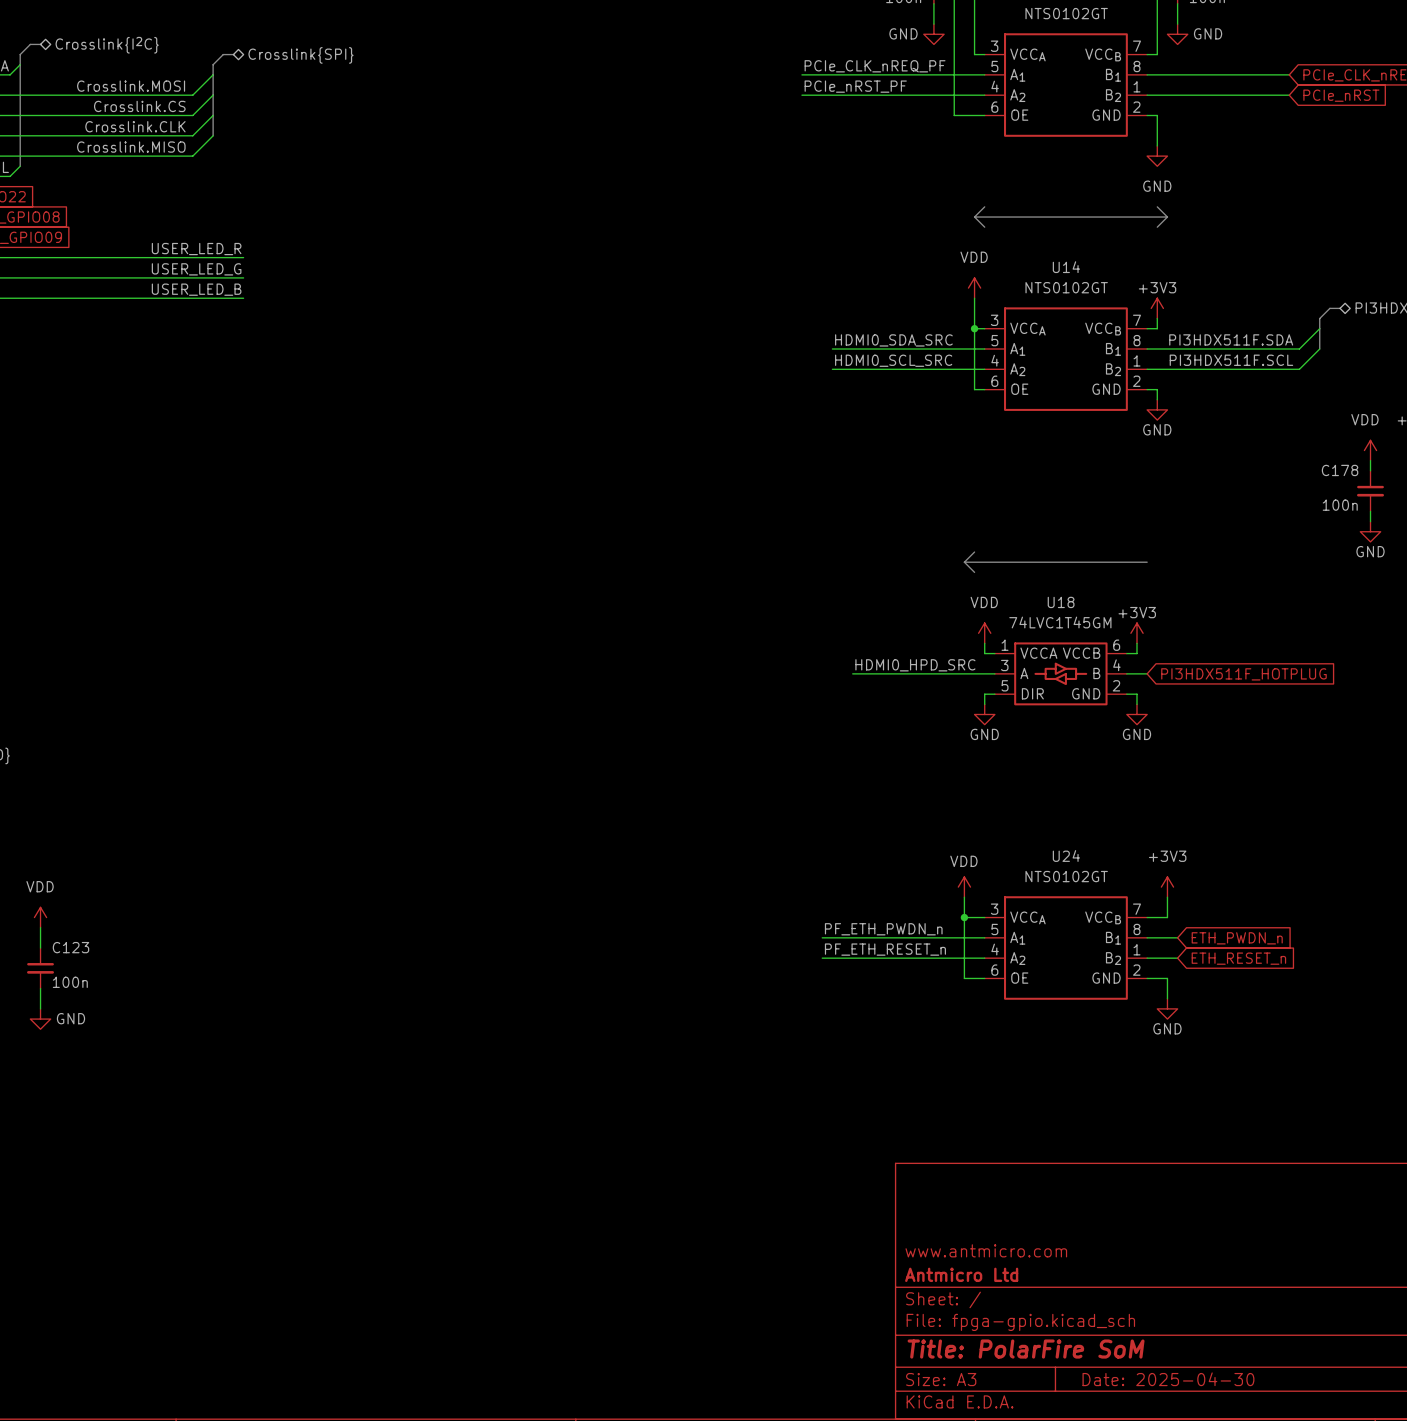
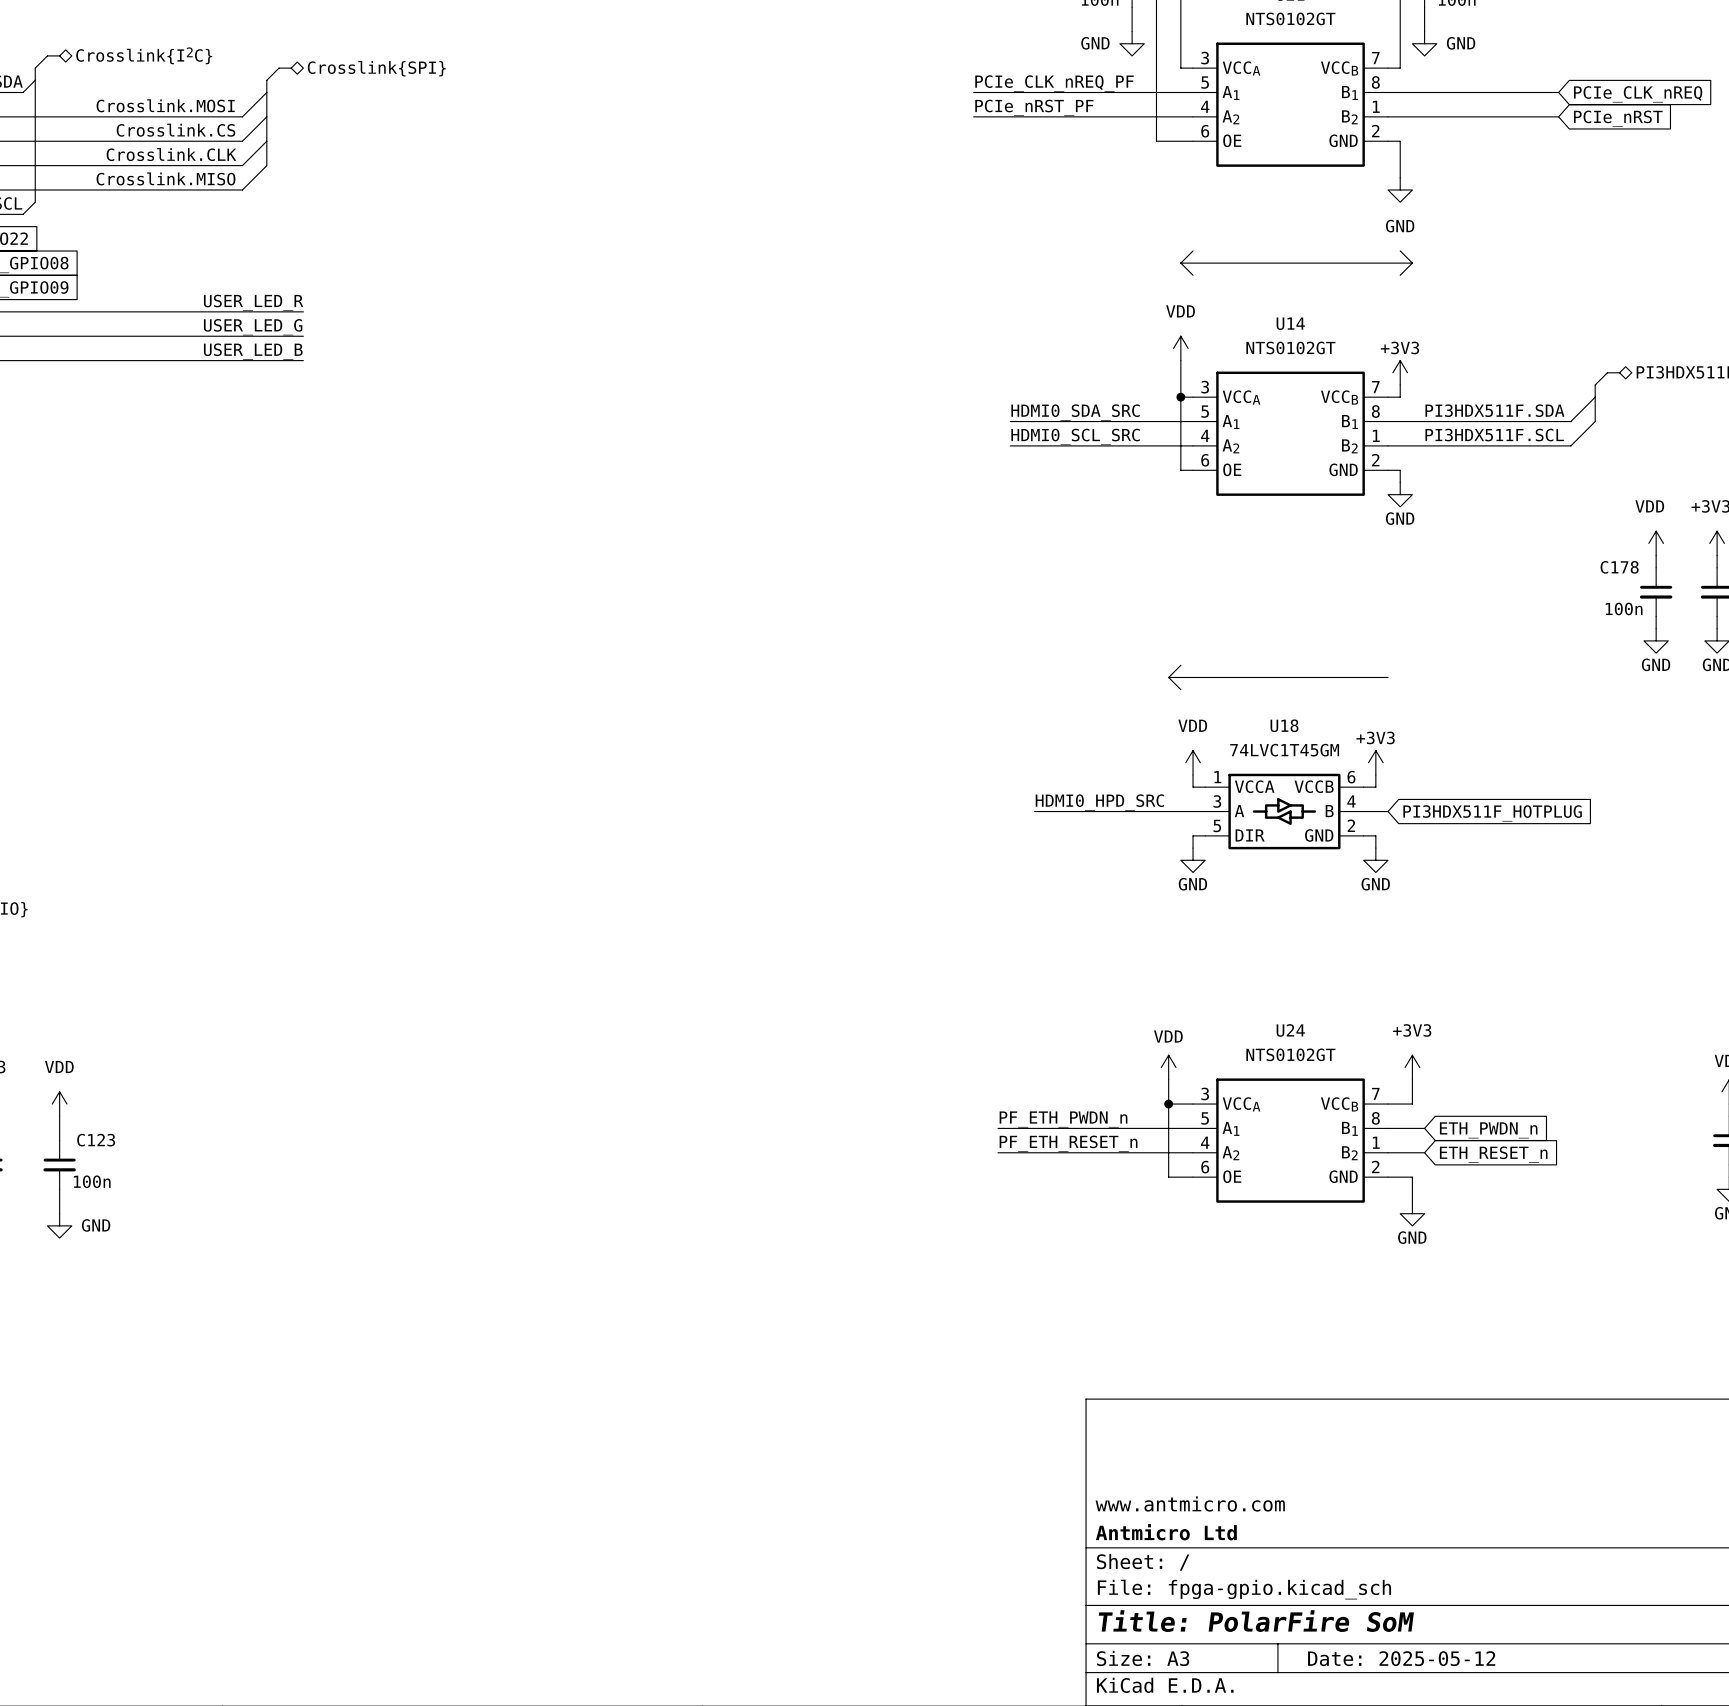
title block: Date: 2025-04-30 (1168, 1379) -> Date: 2025-05-12 (1401, 1658)

